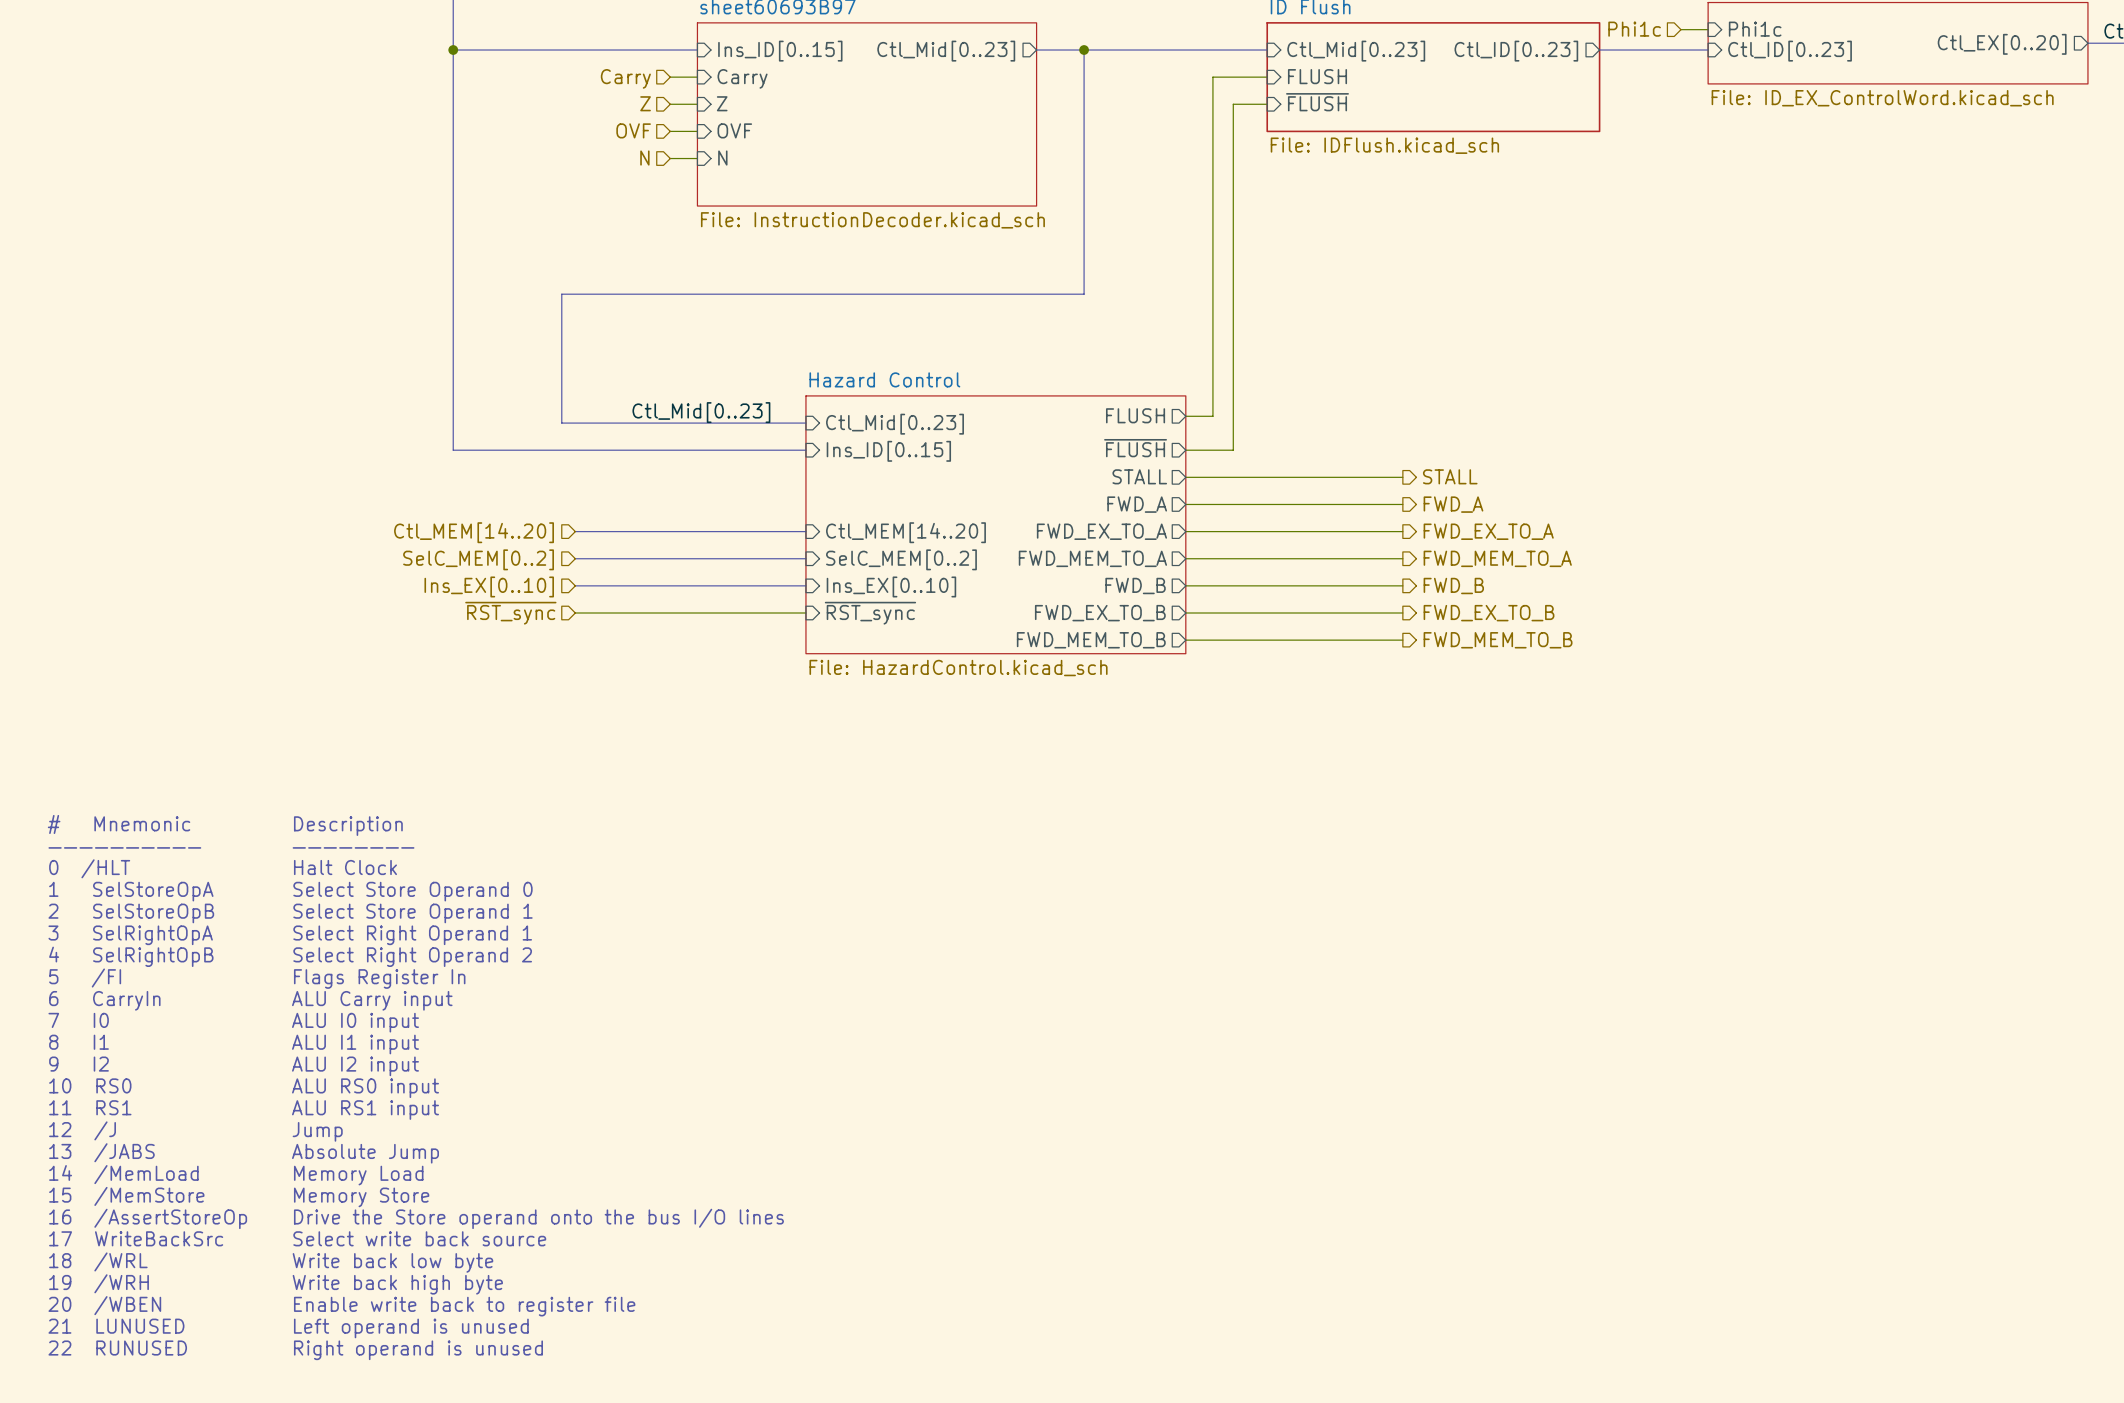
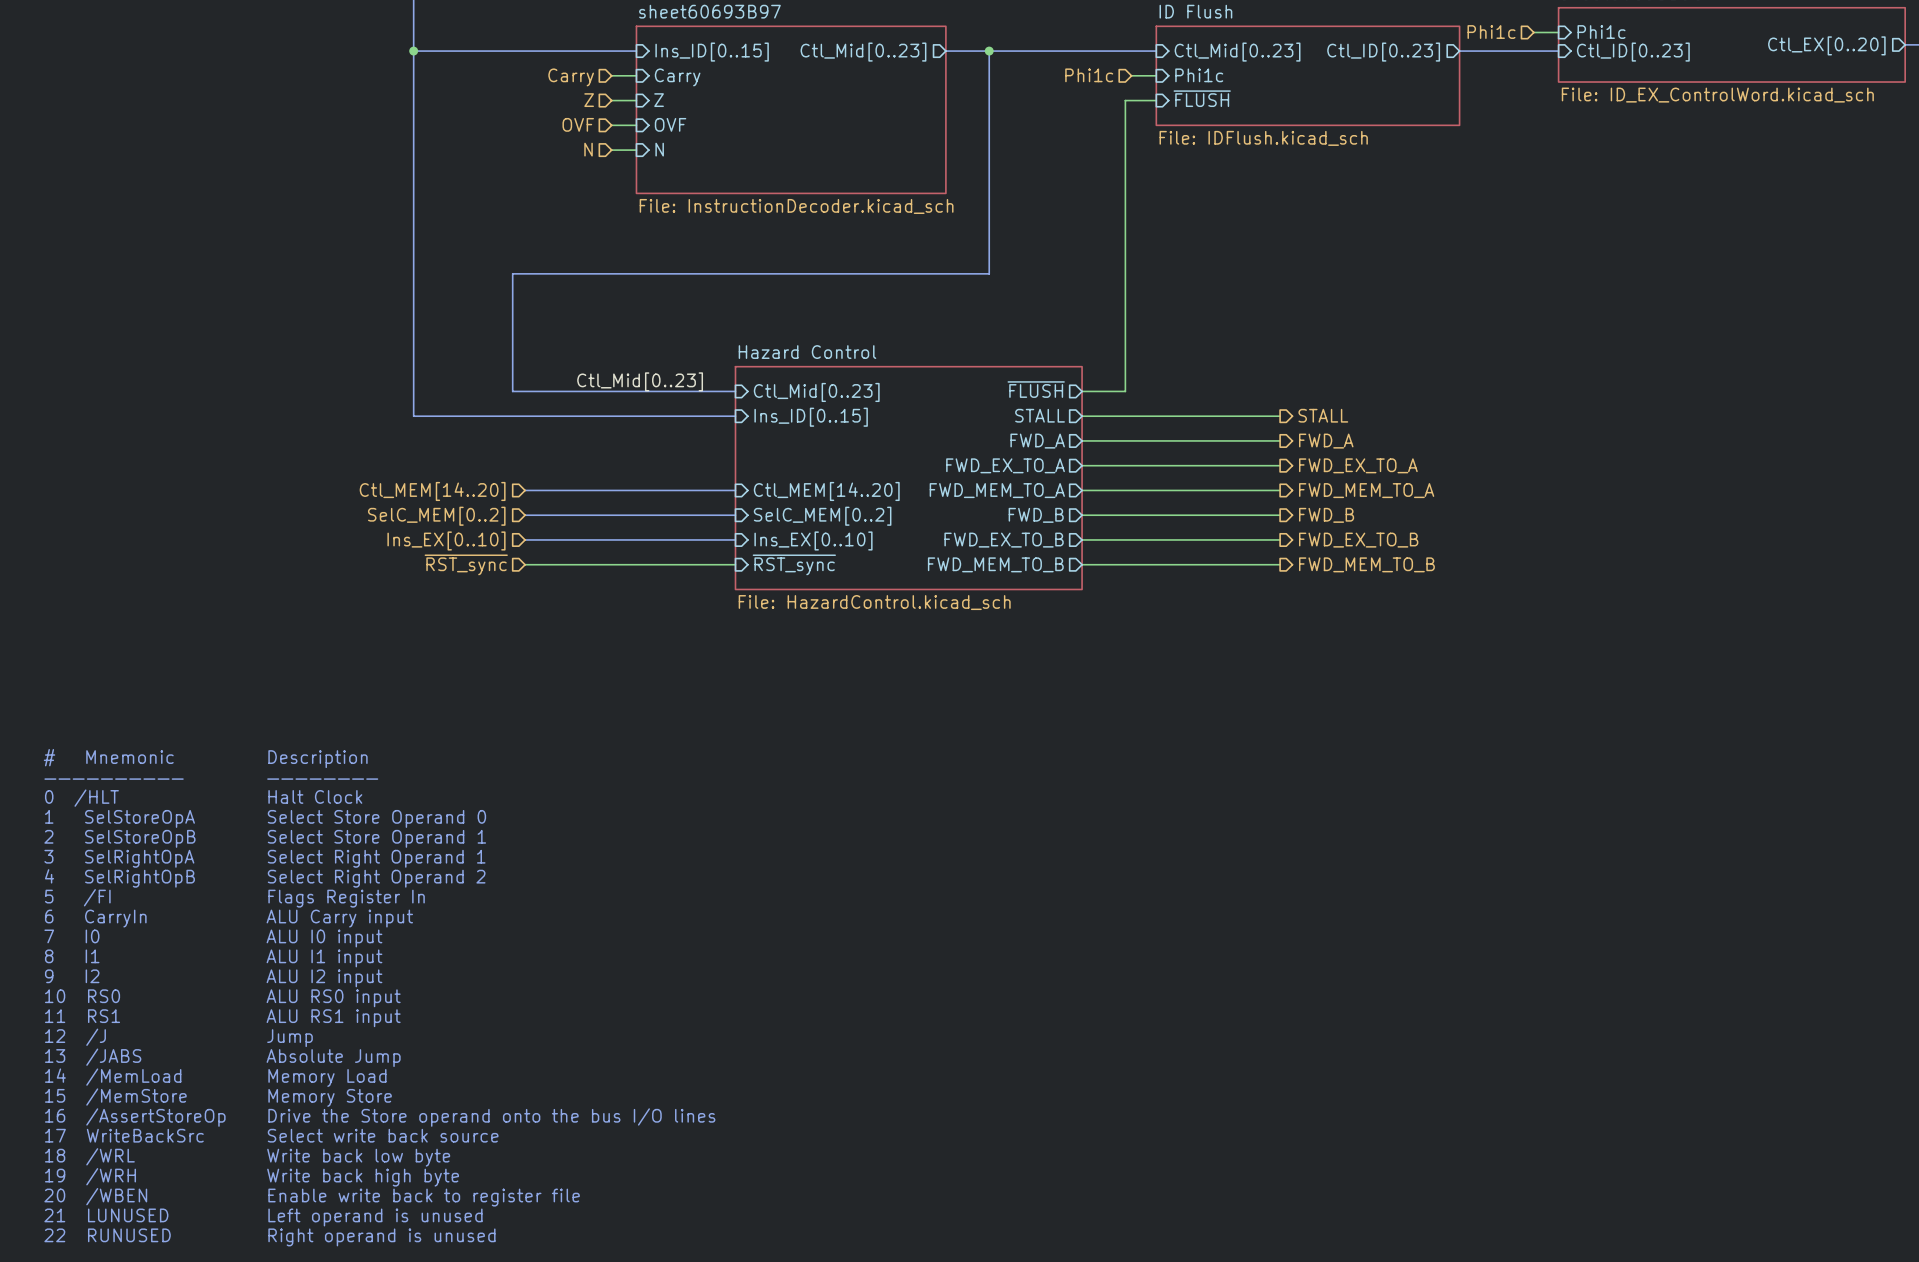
hierarchical label: none -> Phi1c (1089, 75)
sheet pin: FLUSH (1317, 76) -> Phi1c (1199, 75)
wire: (1240, 77) (1212, 77) (1212, 416) (1185, 416) -> none
sheet Hazard Control shape: [805, 395, 1186, 654] -> [735, 366, 1083, 590]
sheet pin: FLUSH (1135, 415) -> ~{FLUSH} (1036, 389)
wire: (1233, 423) (1233, 450) -> (1125, 391) (1082, 391)
sheet pin: ~{FLUSH} (1135, 448) -> STALL (1040, 415)
hierarchical label: none -> STALL (1323, 415)
wire: none -> (1125, 416) (1280, 416)
sheet pin: STALL (1139, 476) -> FWD_A (1037, 441)
hierarchical label: STALL (1450, 476) -> FWD_A (1326, 441)
sheet pin: FWD_A (1137, 504) -> FWD_EX_TO_A (1005, 465)
hierarchical label: FWD_A (1453, 504) -> FWD_EX_TO_A (1358, 465)
sheet pin: FWD_EX_TO_A (1101, 531) -> FWD_MEM_TO_A (997, 490)
hierarchical label: FWD_EX_TO_A (1488, 531) -> FWD_MEM_TO_A (1366, 490)
sheet pin: FWD_MEM_TO_A (1092, 558) -> FWD_B (1036, 515)
hierarchical label: FWD_MEM_TO_A (1497, 558) -> FWD_B (1326, 515)
sheet pin: FWD_B (1135, 586) -> FWD_EX_TO_B (1004, 540)
hierarchical label: FWD_B (1453, 586) -> FWD_EX_TO_B (1358, 540)
sheet pin: FWD_EX_TO_B (1100, 613) -> FWD_MEM_TO_B (995, 564)
hierarchical label: FWD_EX_TO_B (1489, 613) -> FWD_MEM_TO_B (1366, 564)
sheet pin: FWD_MEM_TO_B (1091, 640) -> none
wire: (1185, 640) (1402, 640) -> none
hierarchical label: FWD_MEM_TO_B (1498, 640) -> none

